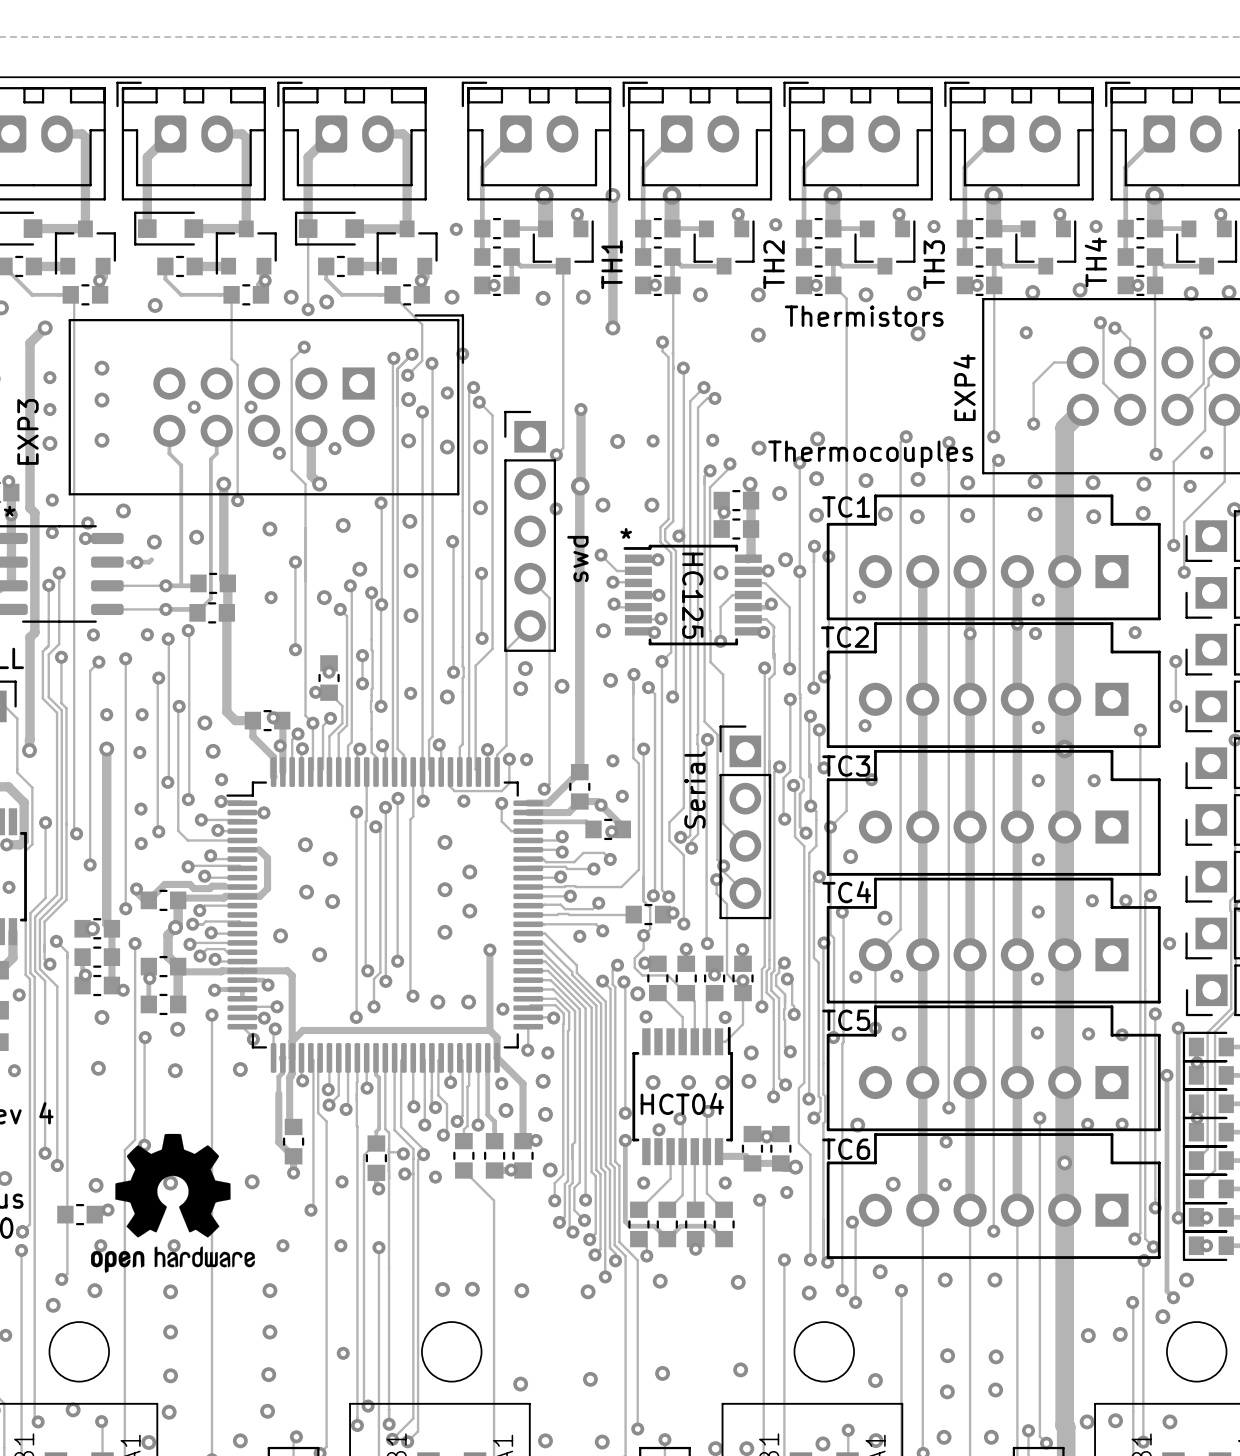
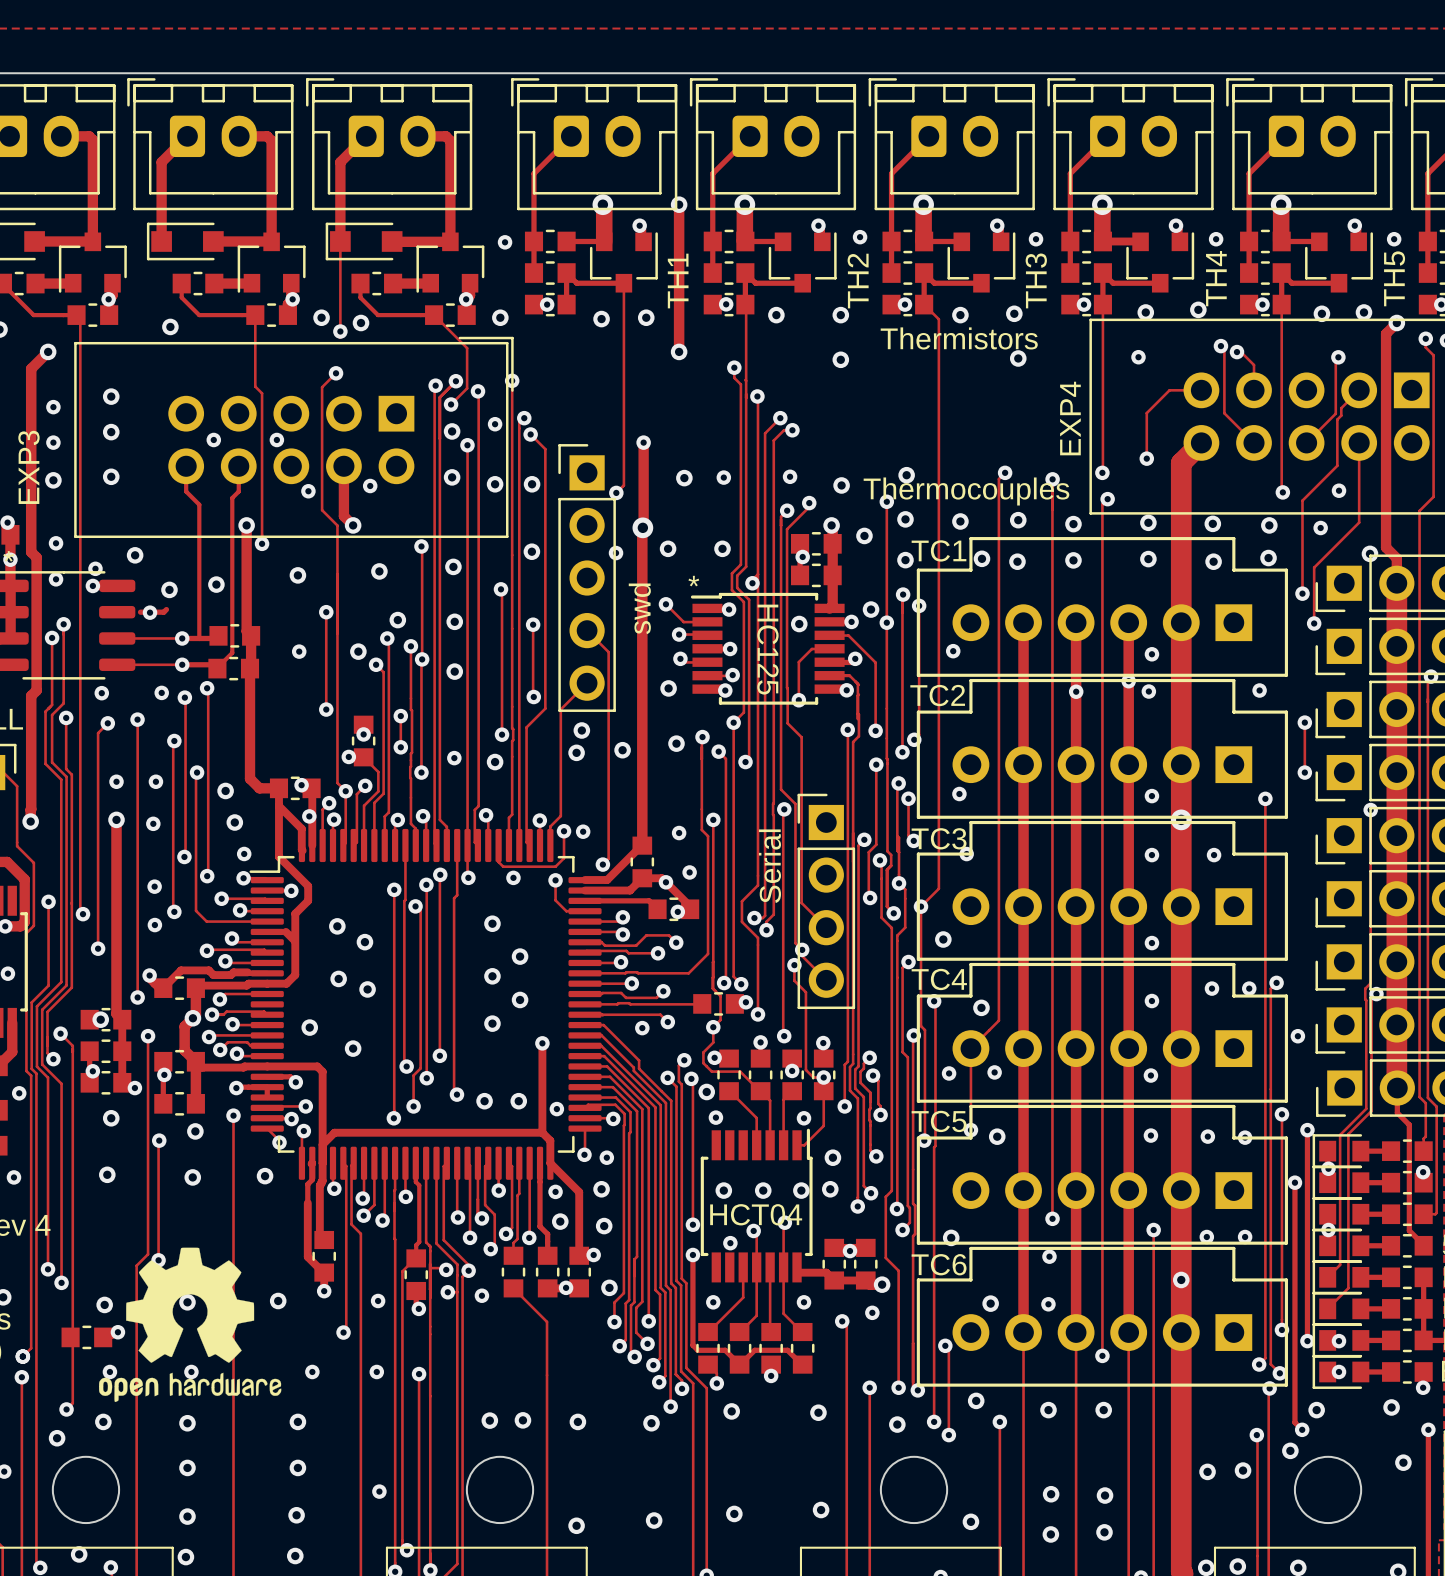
track: none -> (278, 806) (278, 856) (308, 886) (308, 900) (295, 913) (295, 941)

